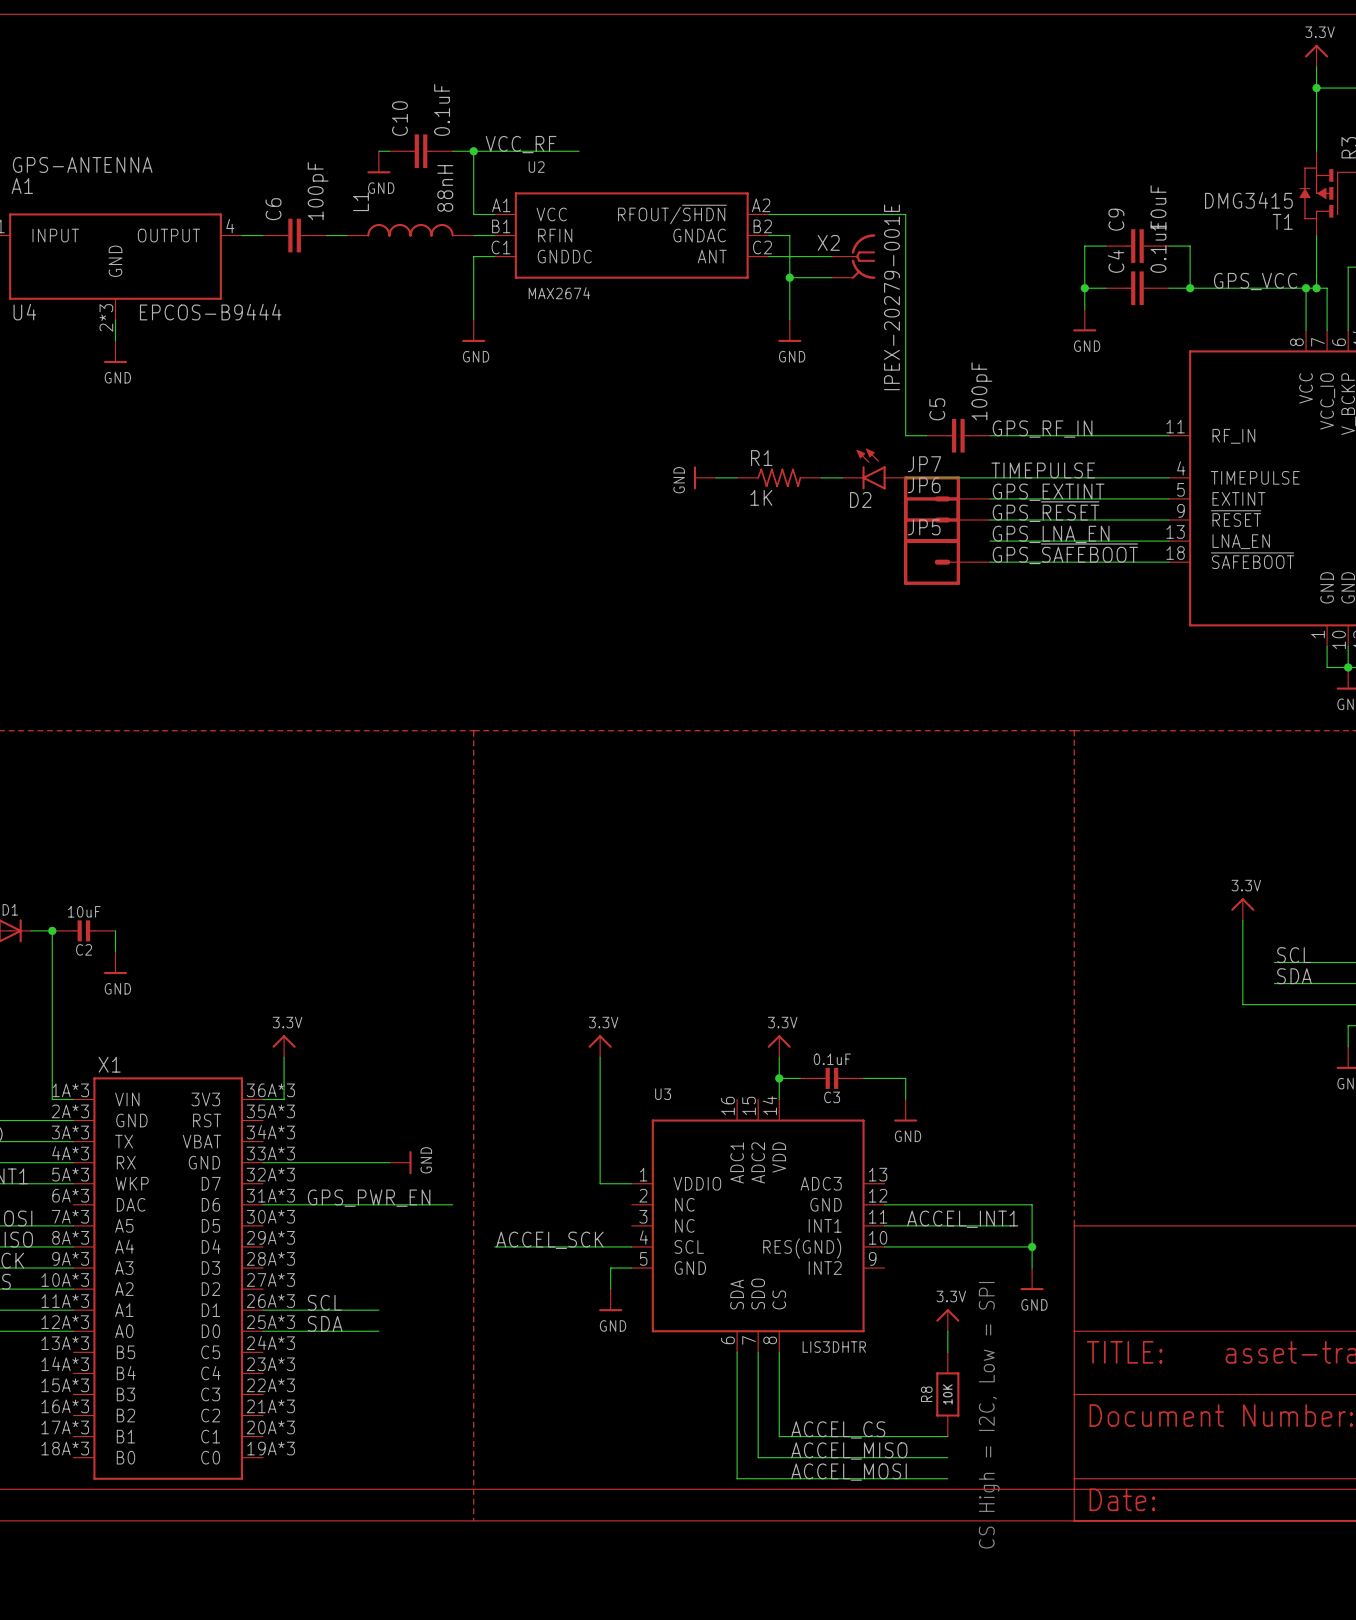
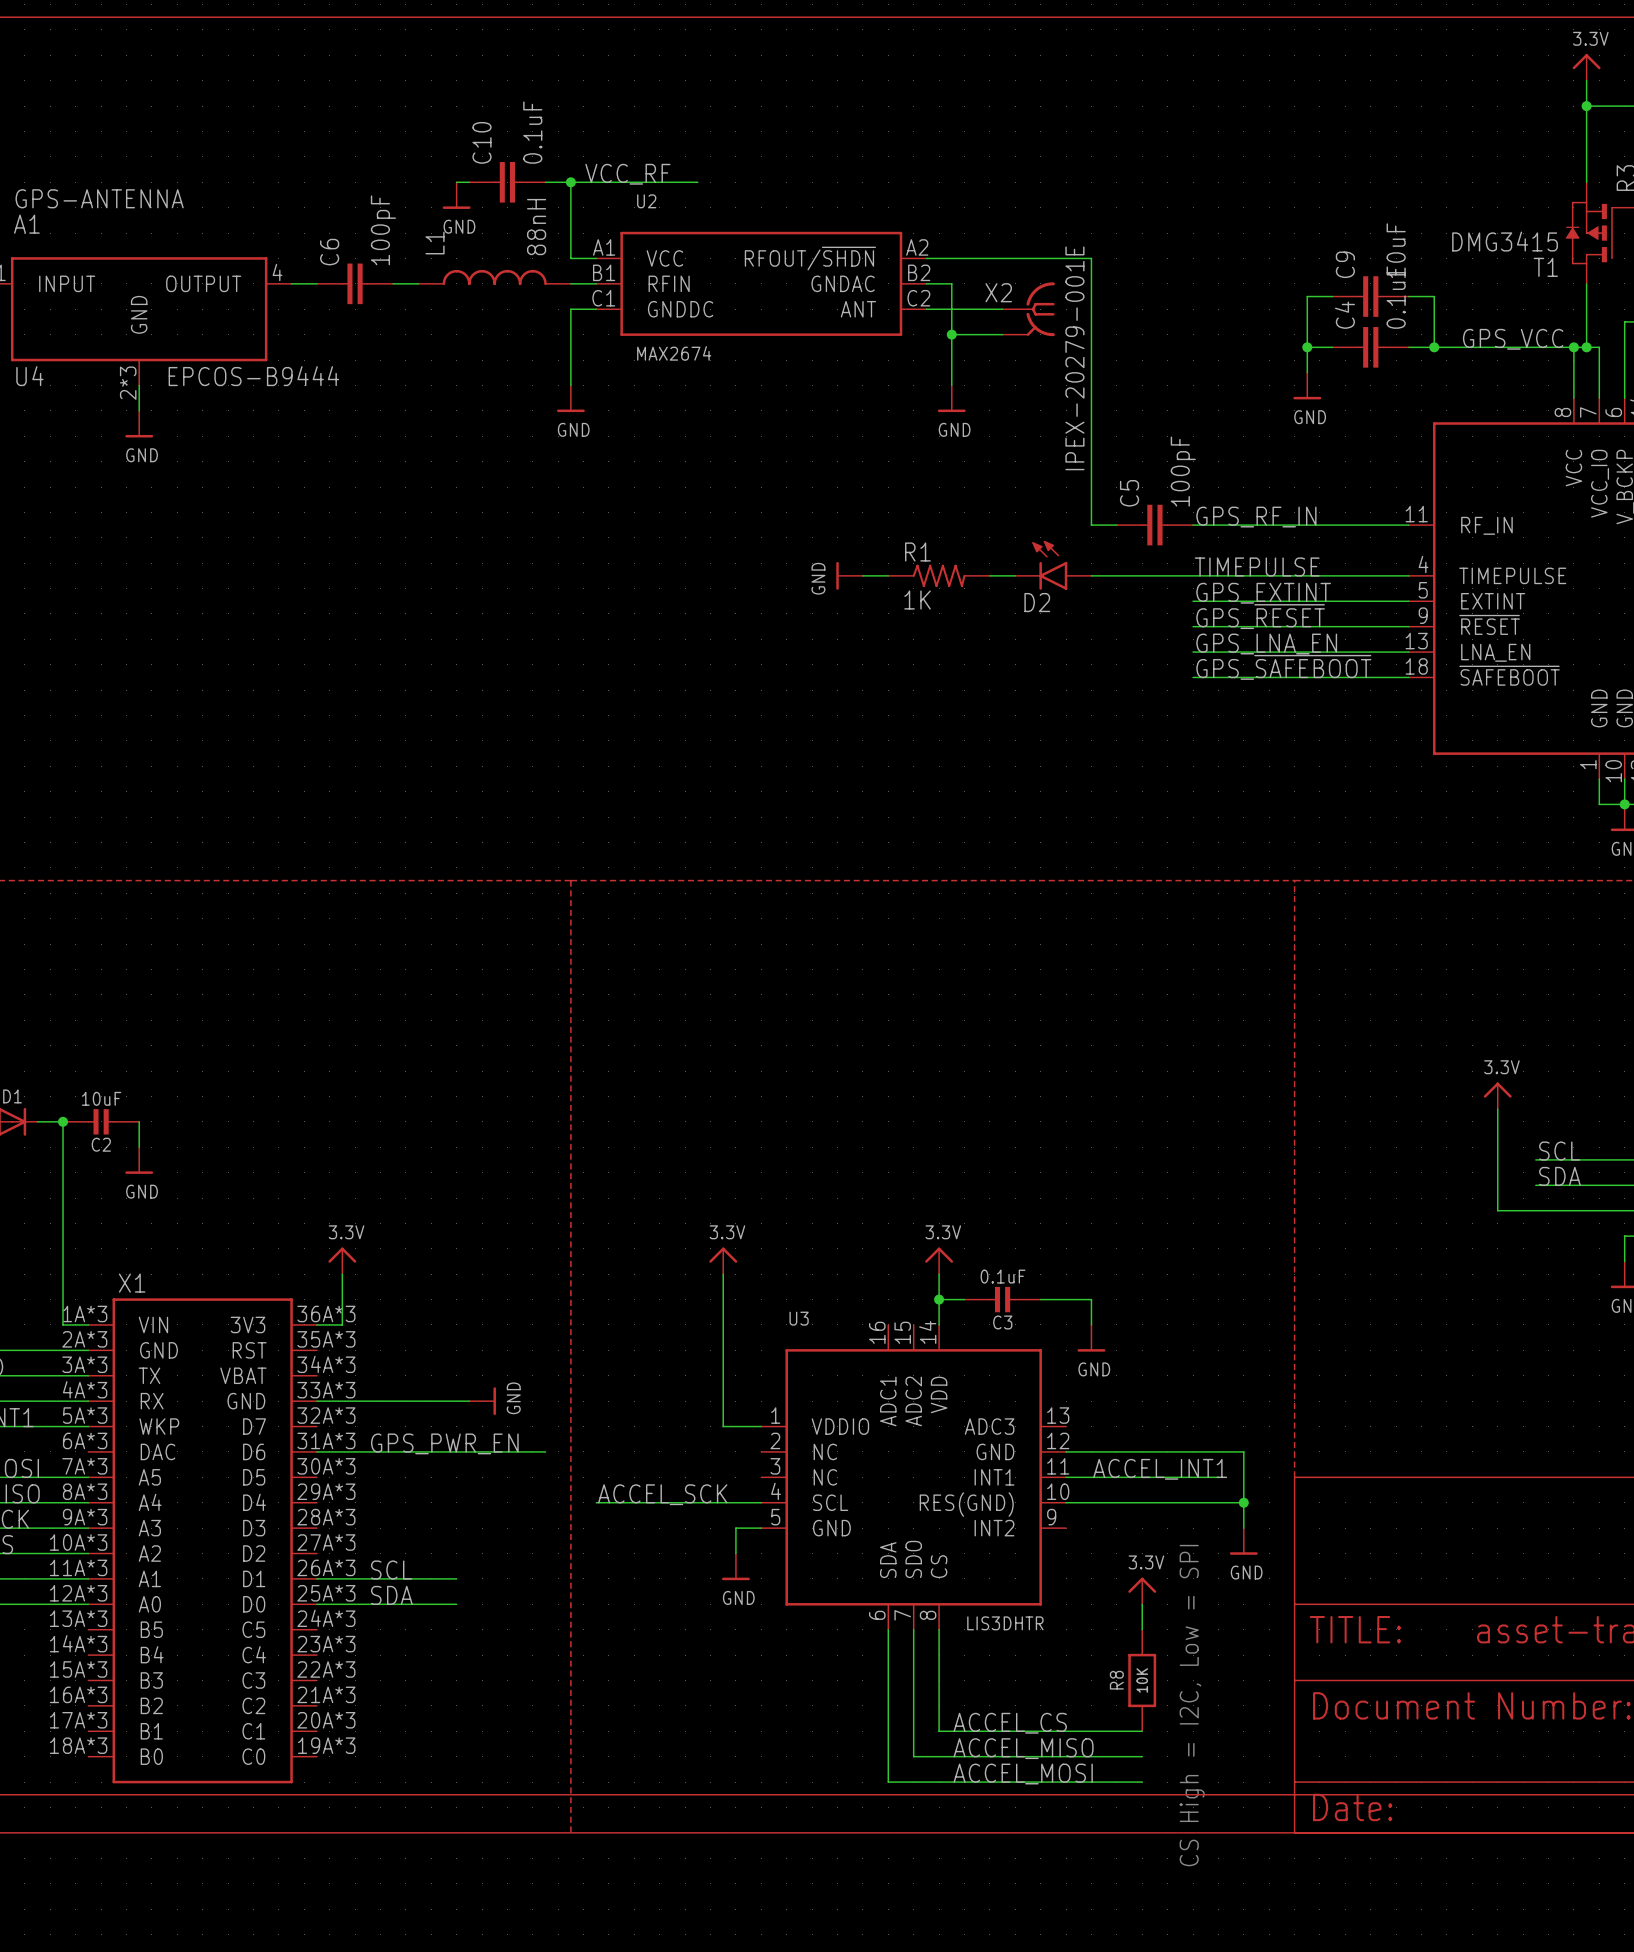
JP7: (946, 498) -> none
JP6: (946, 520) -> none
JP5: (946, 562) -> none

